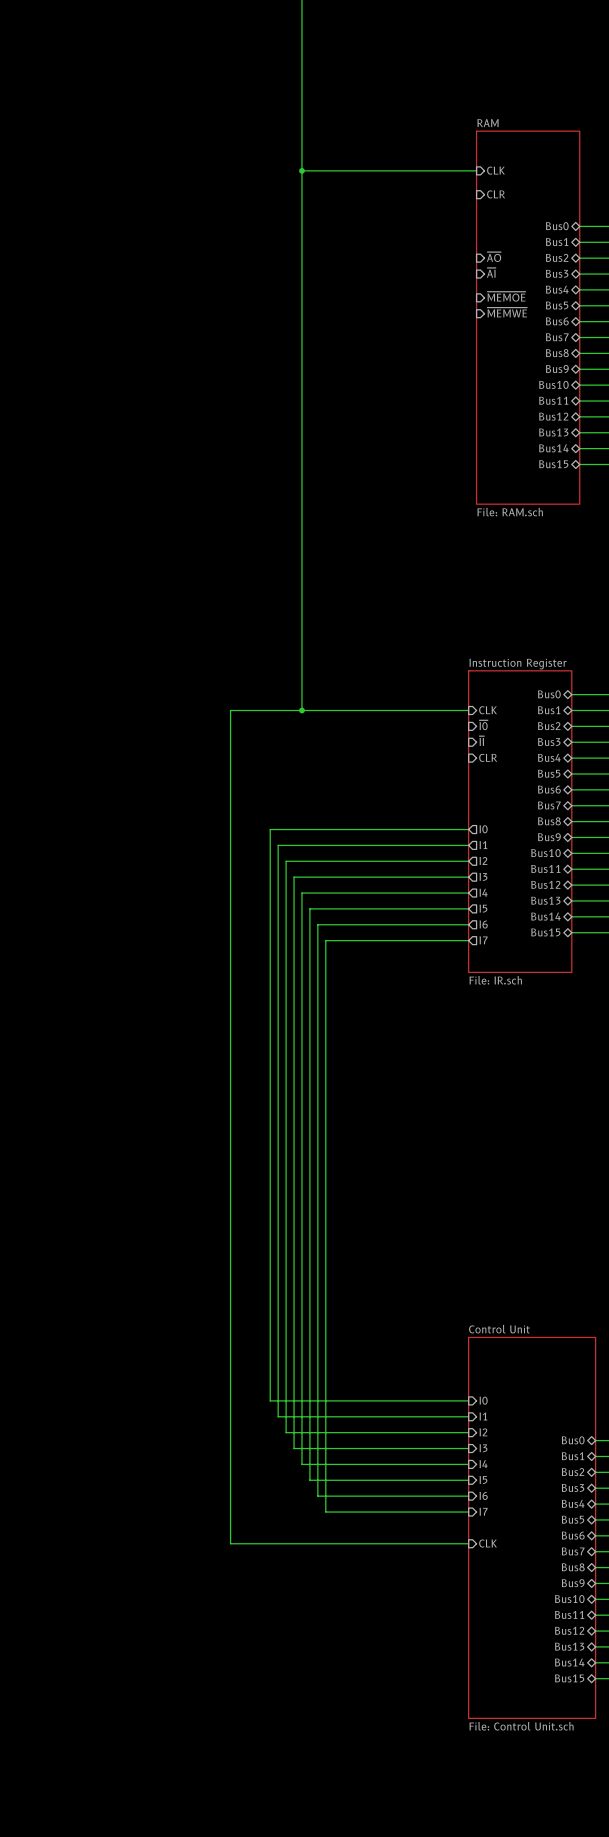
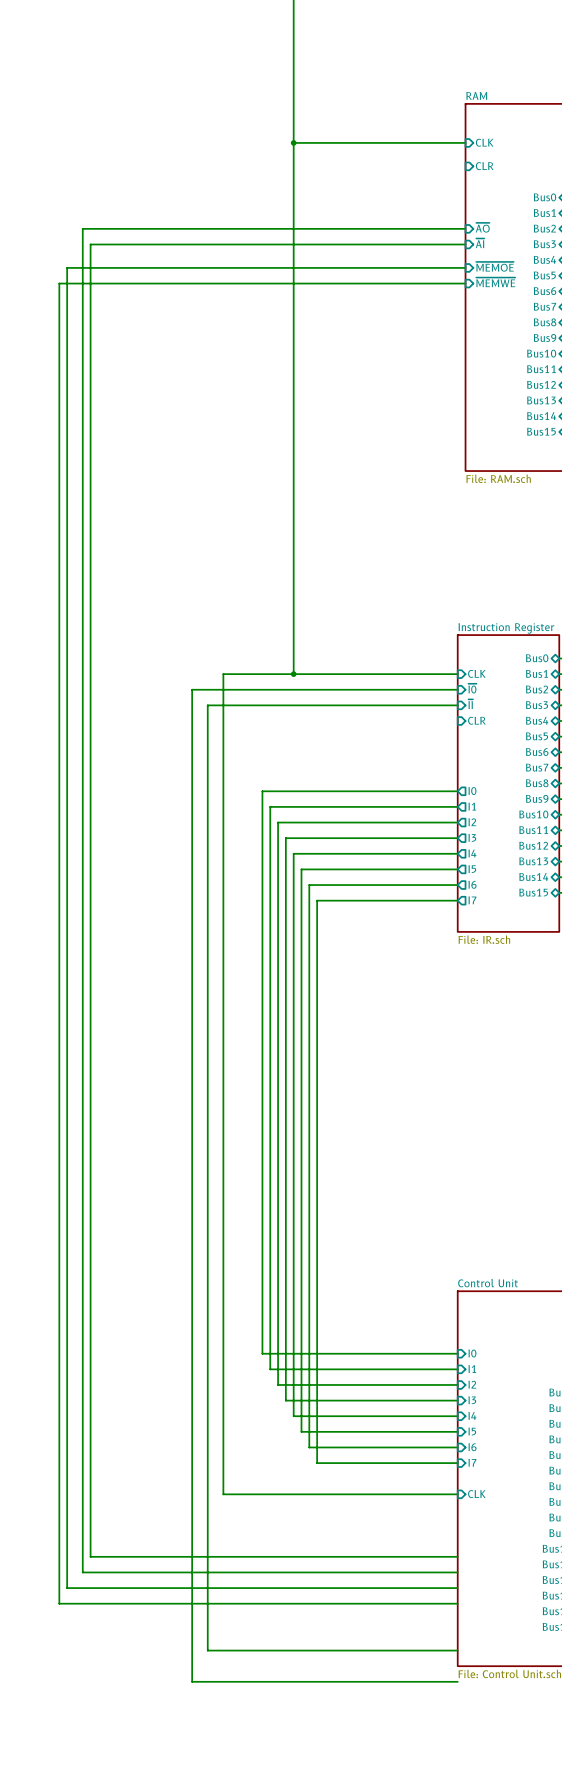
wire: none -> (465, 228) (82, 228) (82, 1572) (457, 1572)
wire: none -> (465, 244) (90, 244) (90, 1556) (457, 1556)
wire: none -> (465, 267) (67, 267) (67, 1588) (457, 1588)
wire: none -> (465, 283) (59, 283) (59, 1603) (457, 1603)
wire: none -> (457, 689) (192, 689) (192, 1681) (457, 1681)
wire: none -> (457, 705) (207, 705) (207, 1650) (457, 1650)

